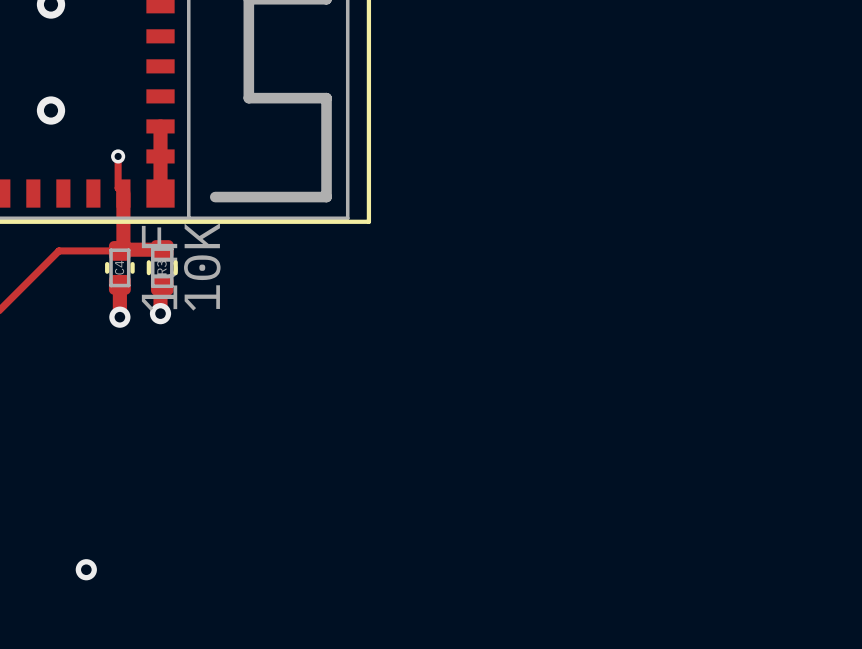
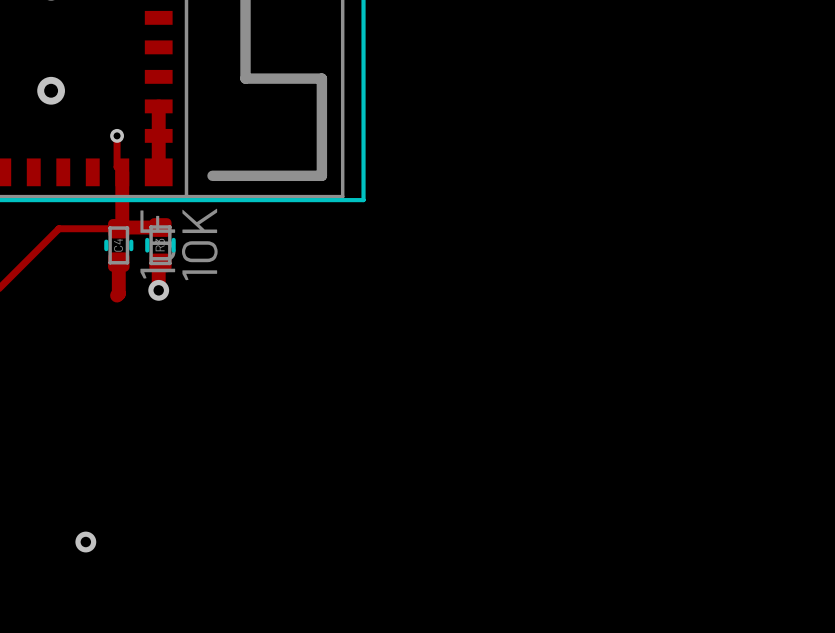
via: (119, 317) -> none

